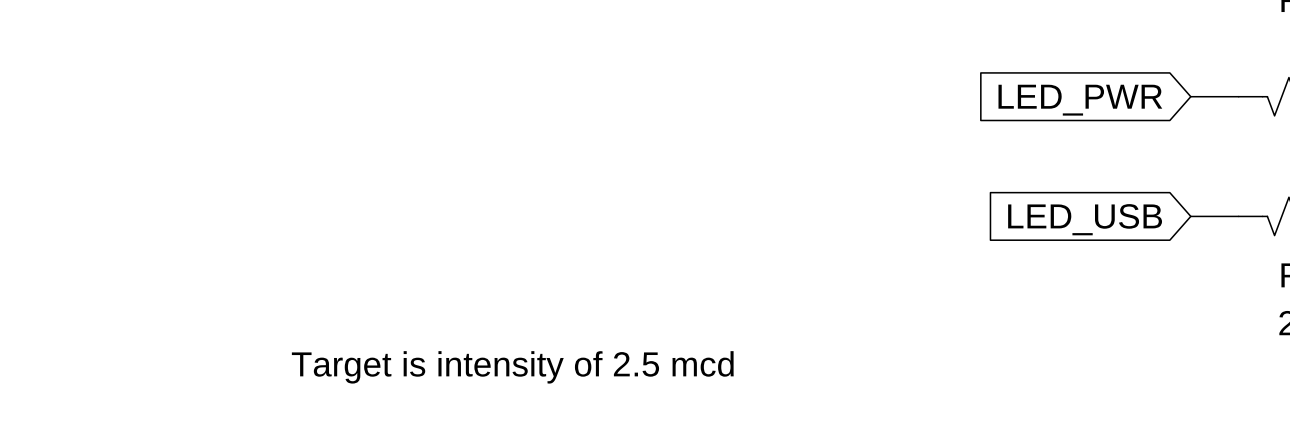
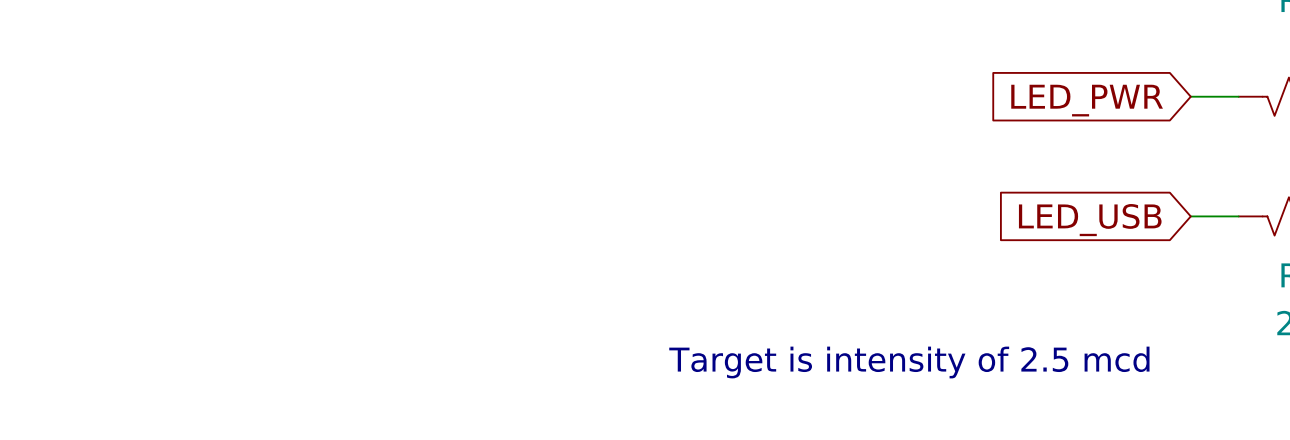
text position: Target is intensity of 2.5 mcd (512, 367) -> Target is intensity of 2.5 mcd (909, 362)

